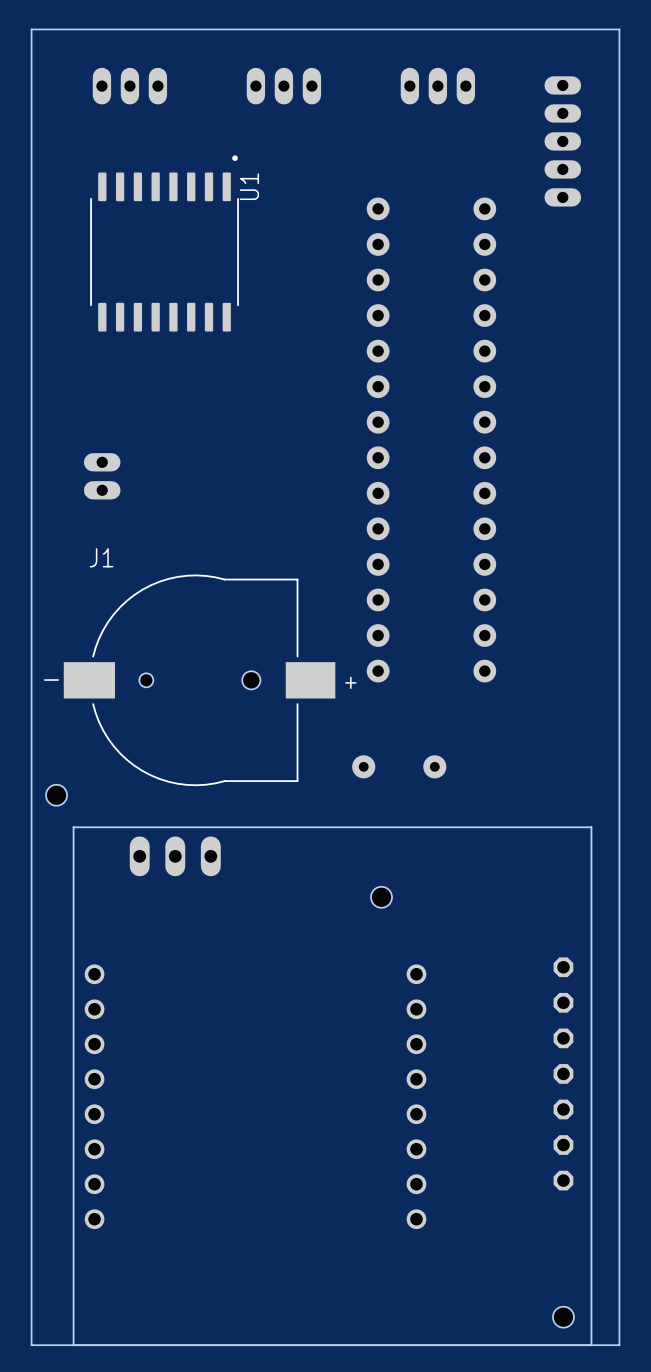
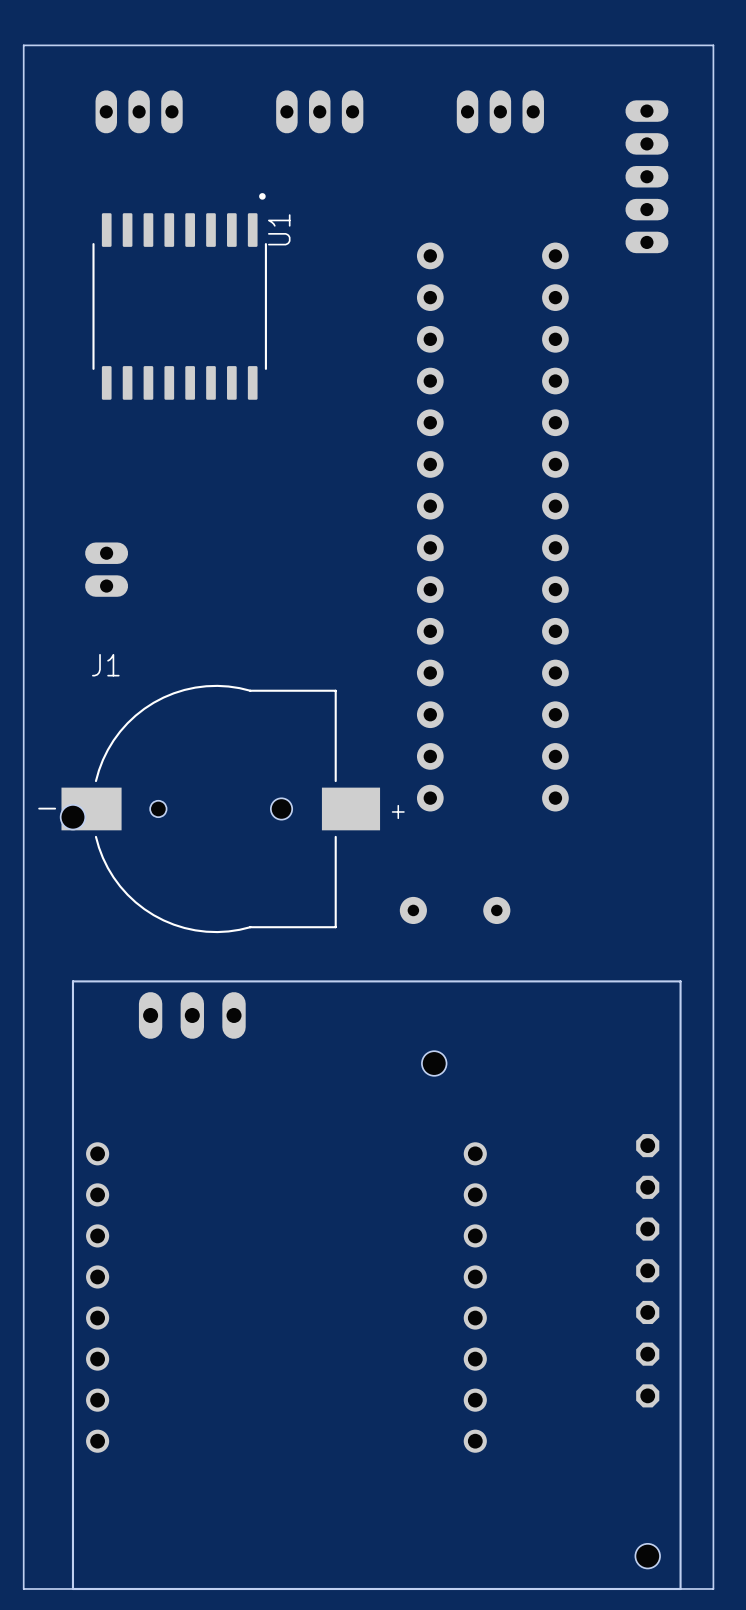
hole position: (56, 795) -> (72, 817)

